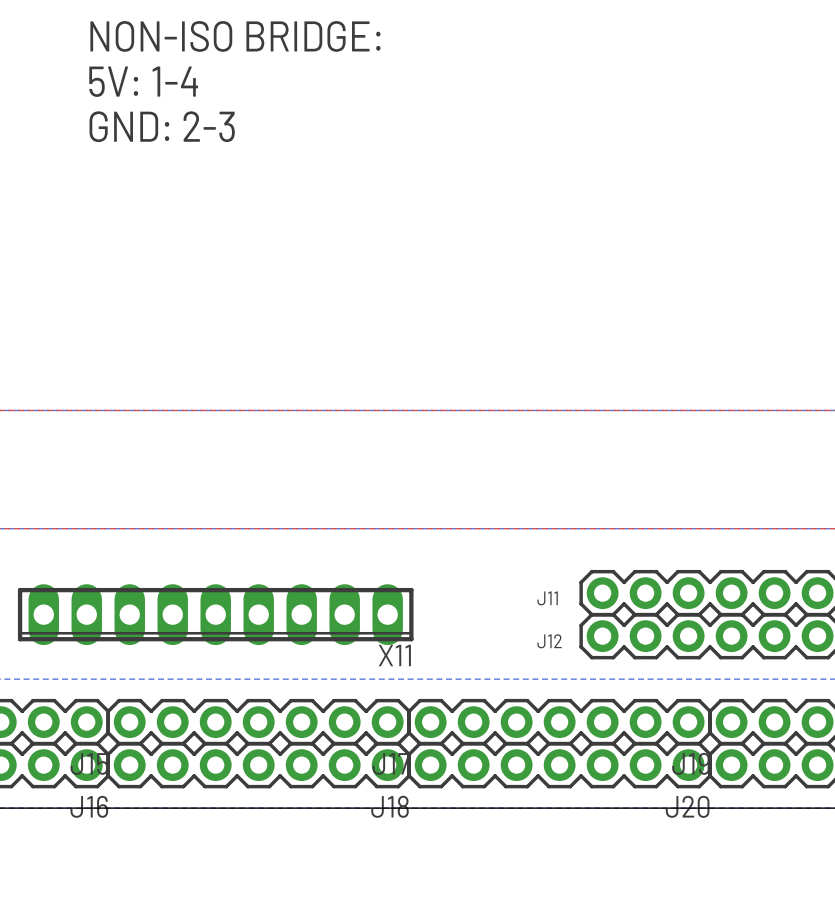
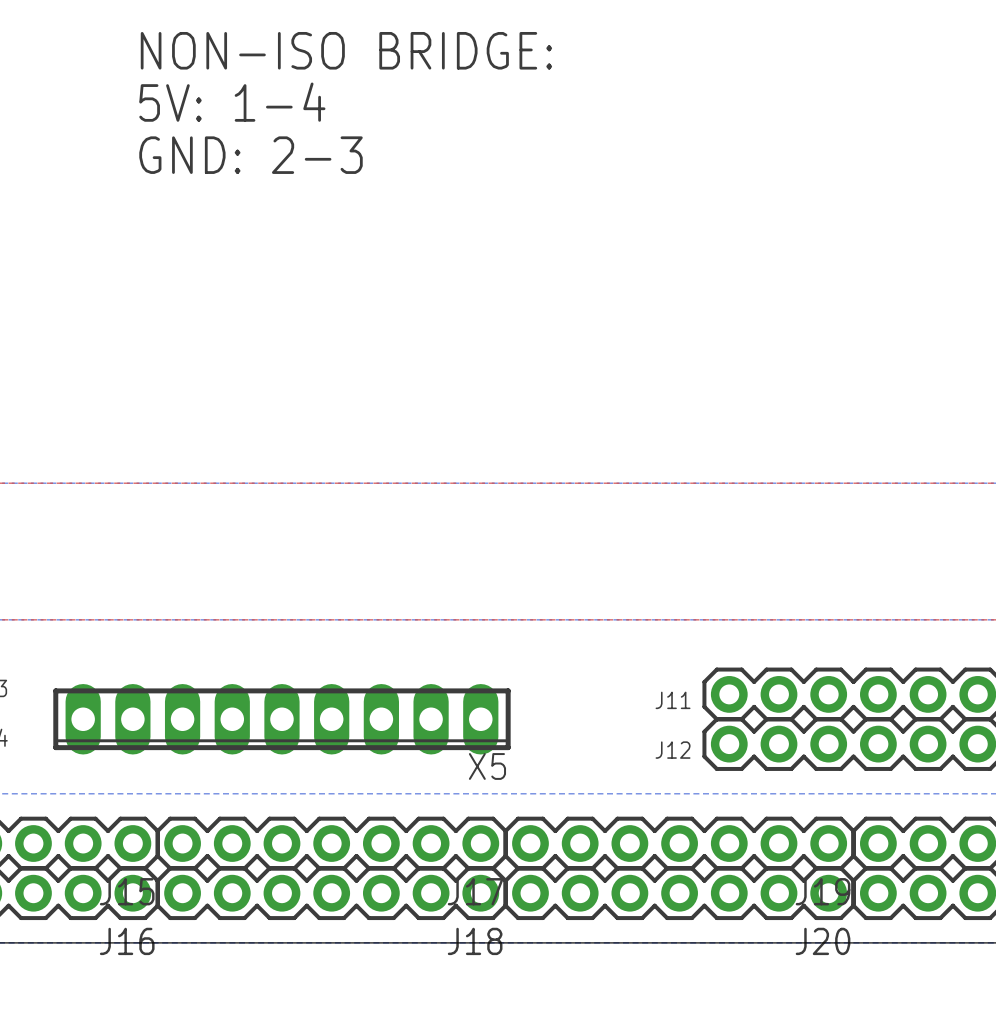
X11 name: X11 (394, 655) -> X5 (487, 766)

